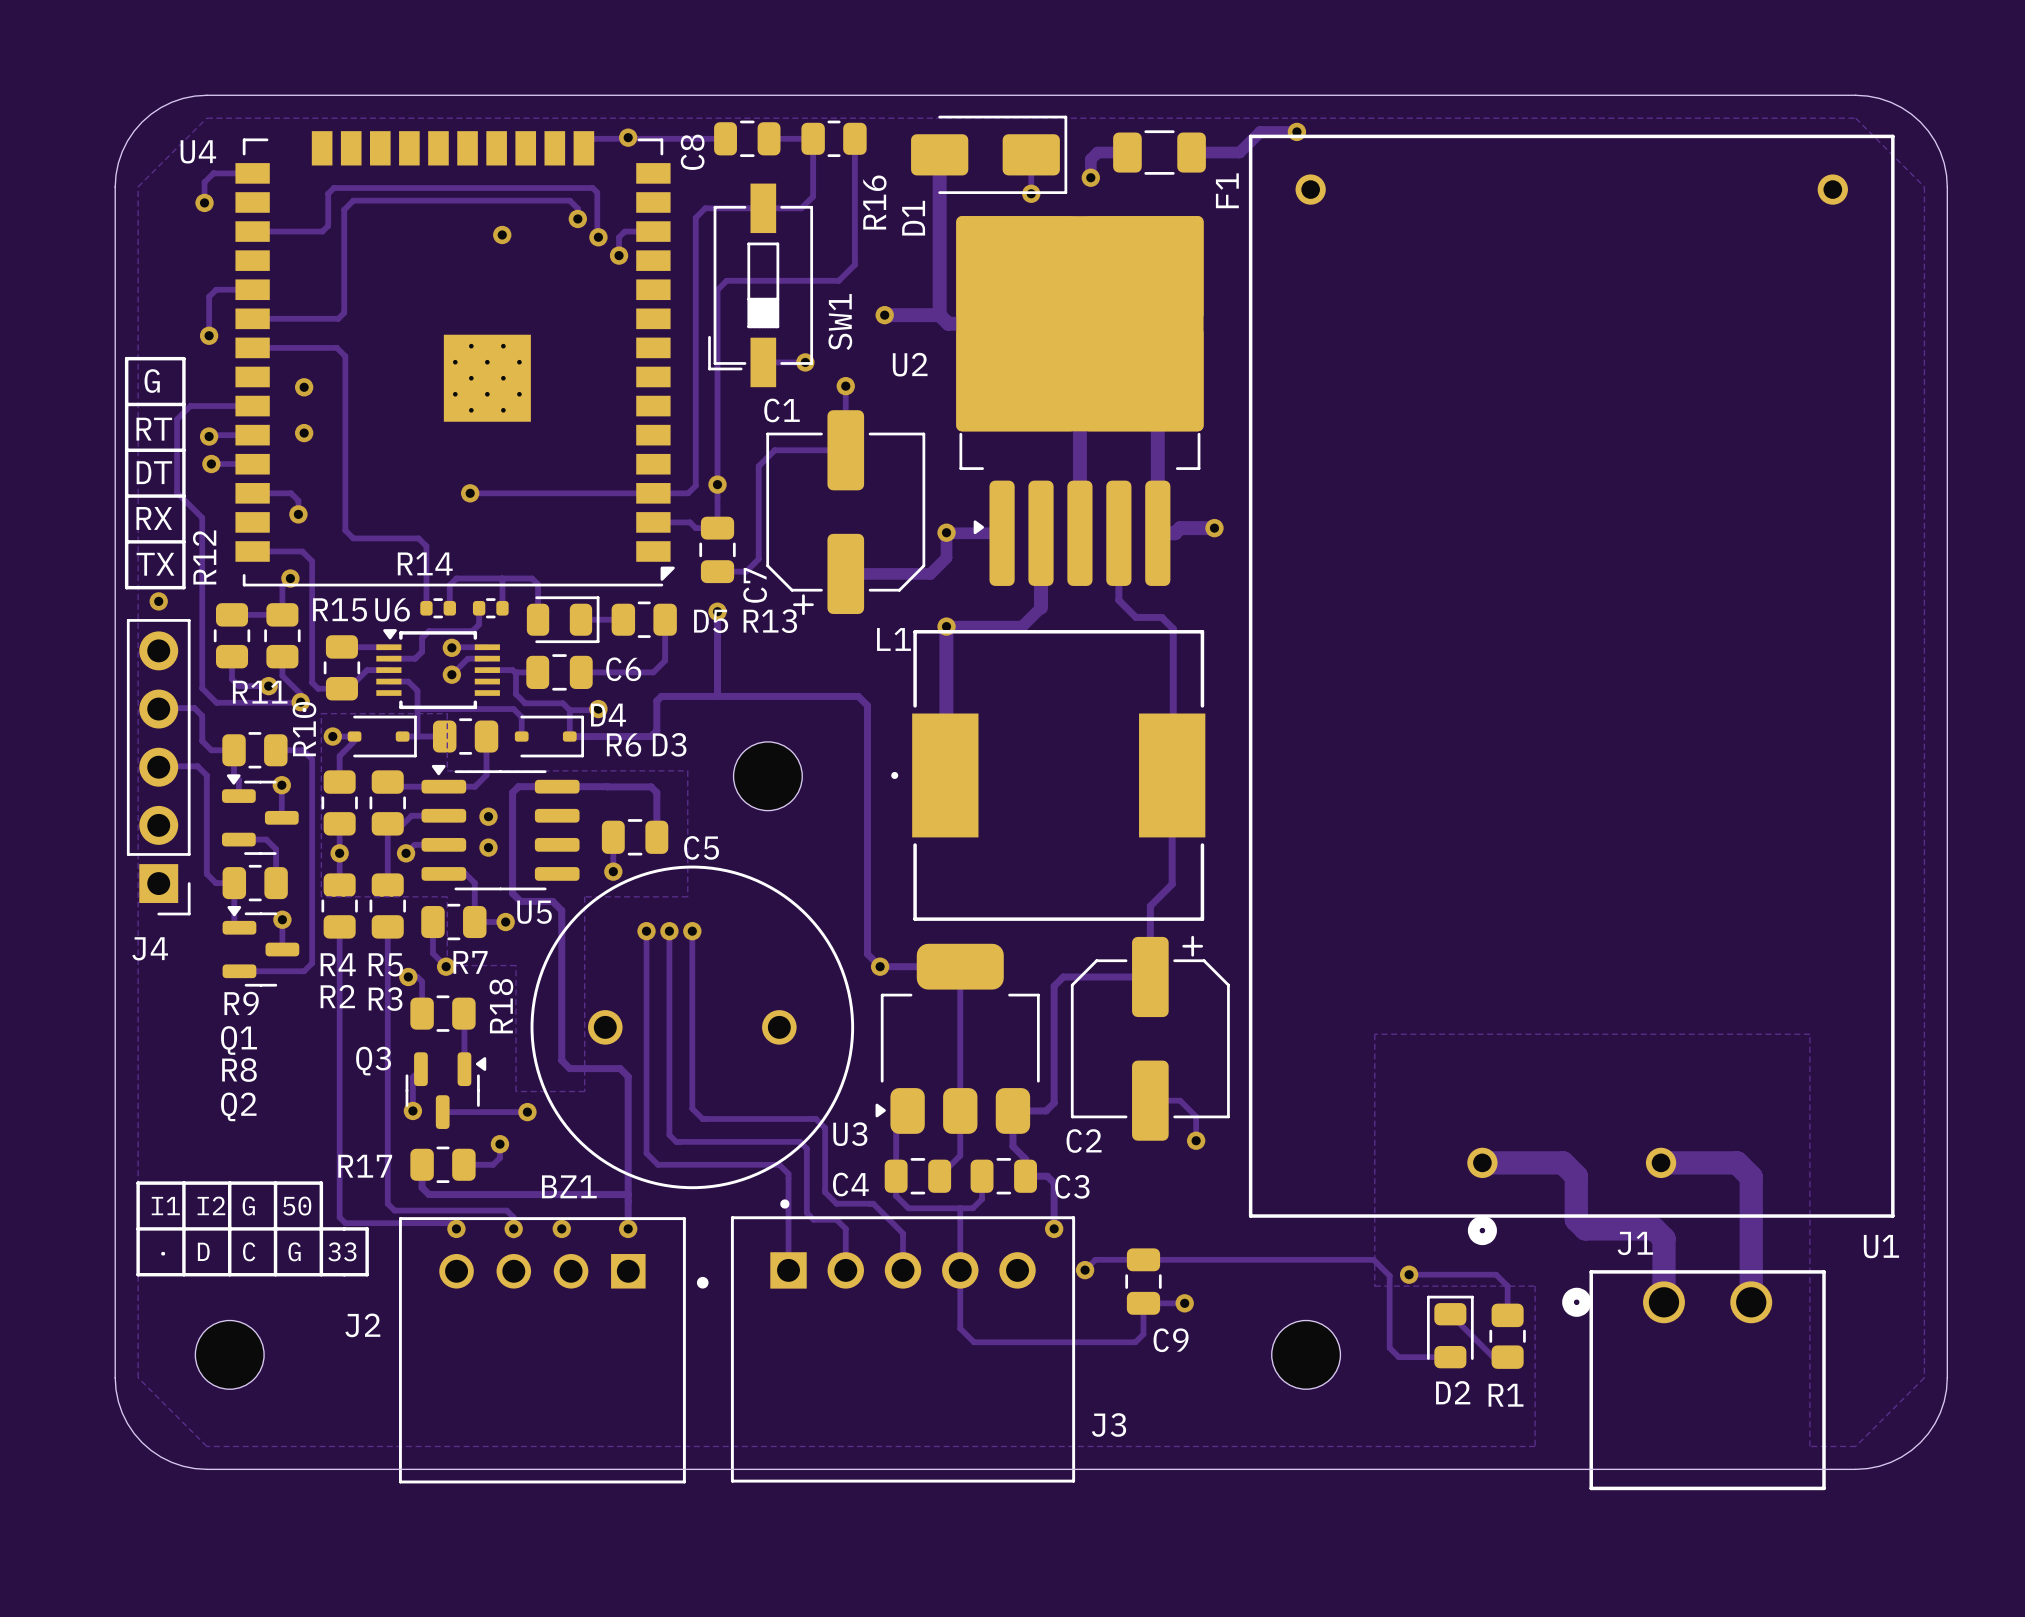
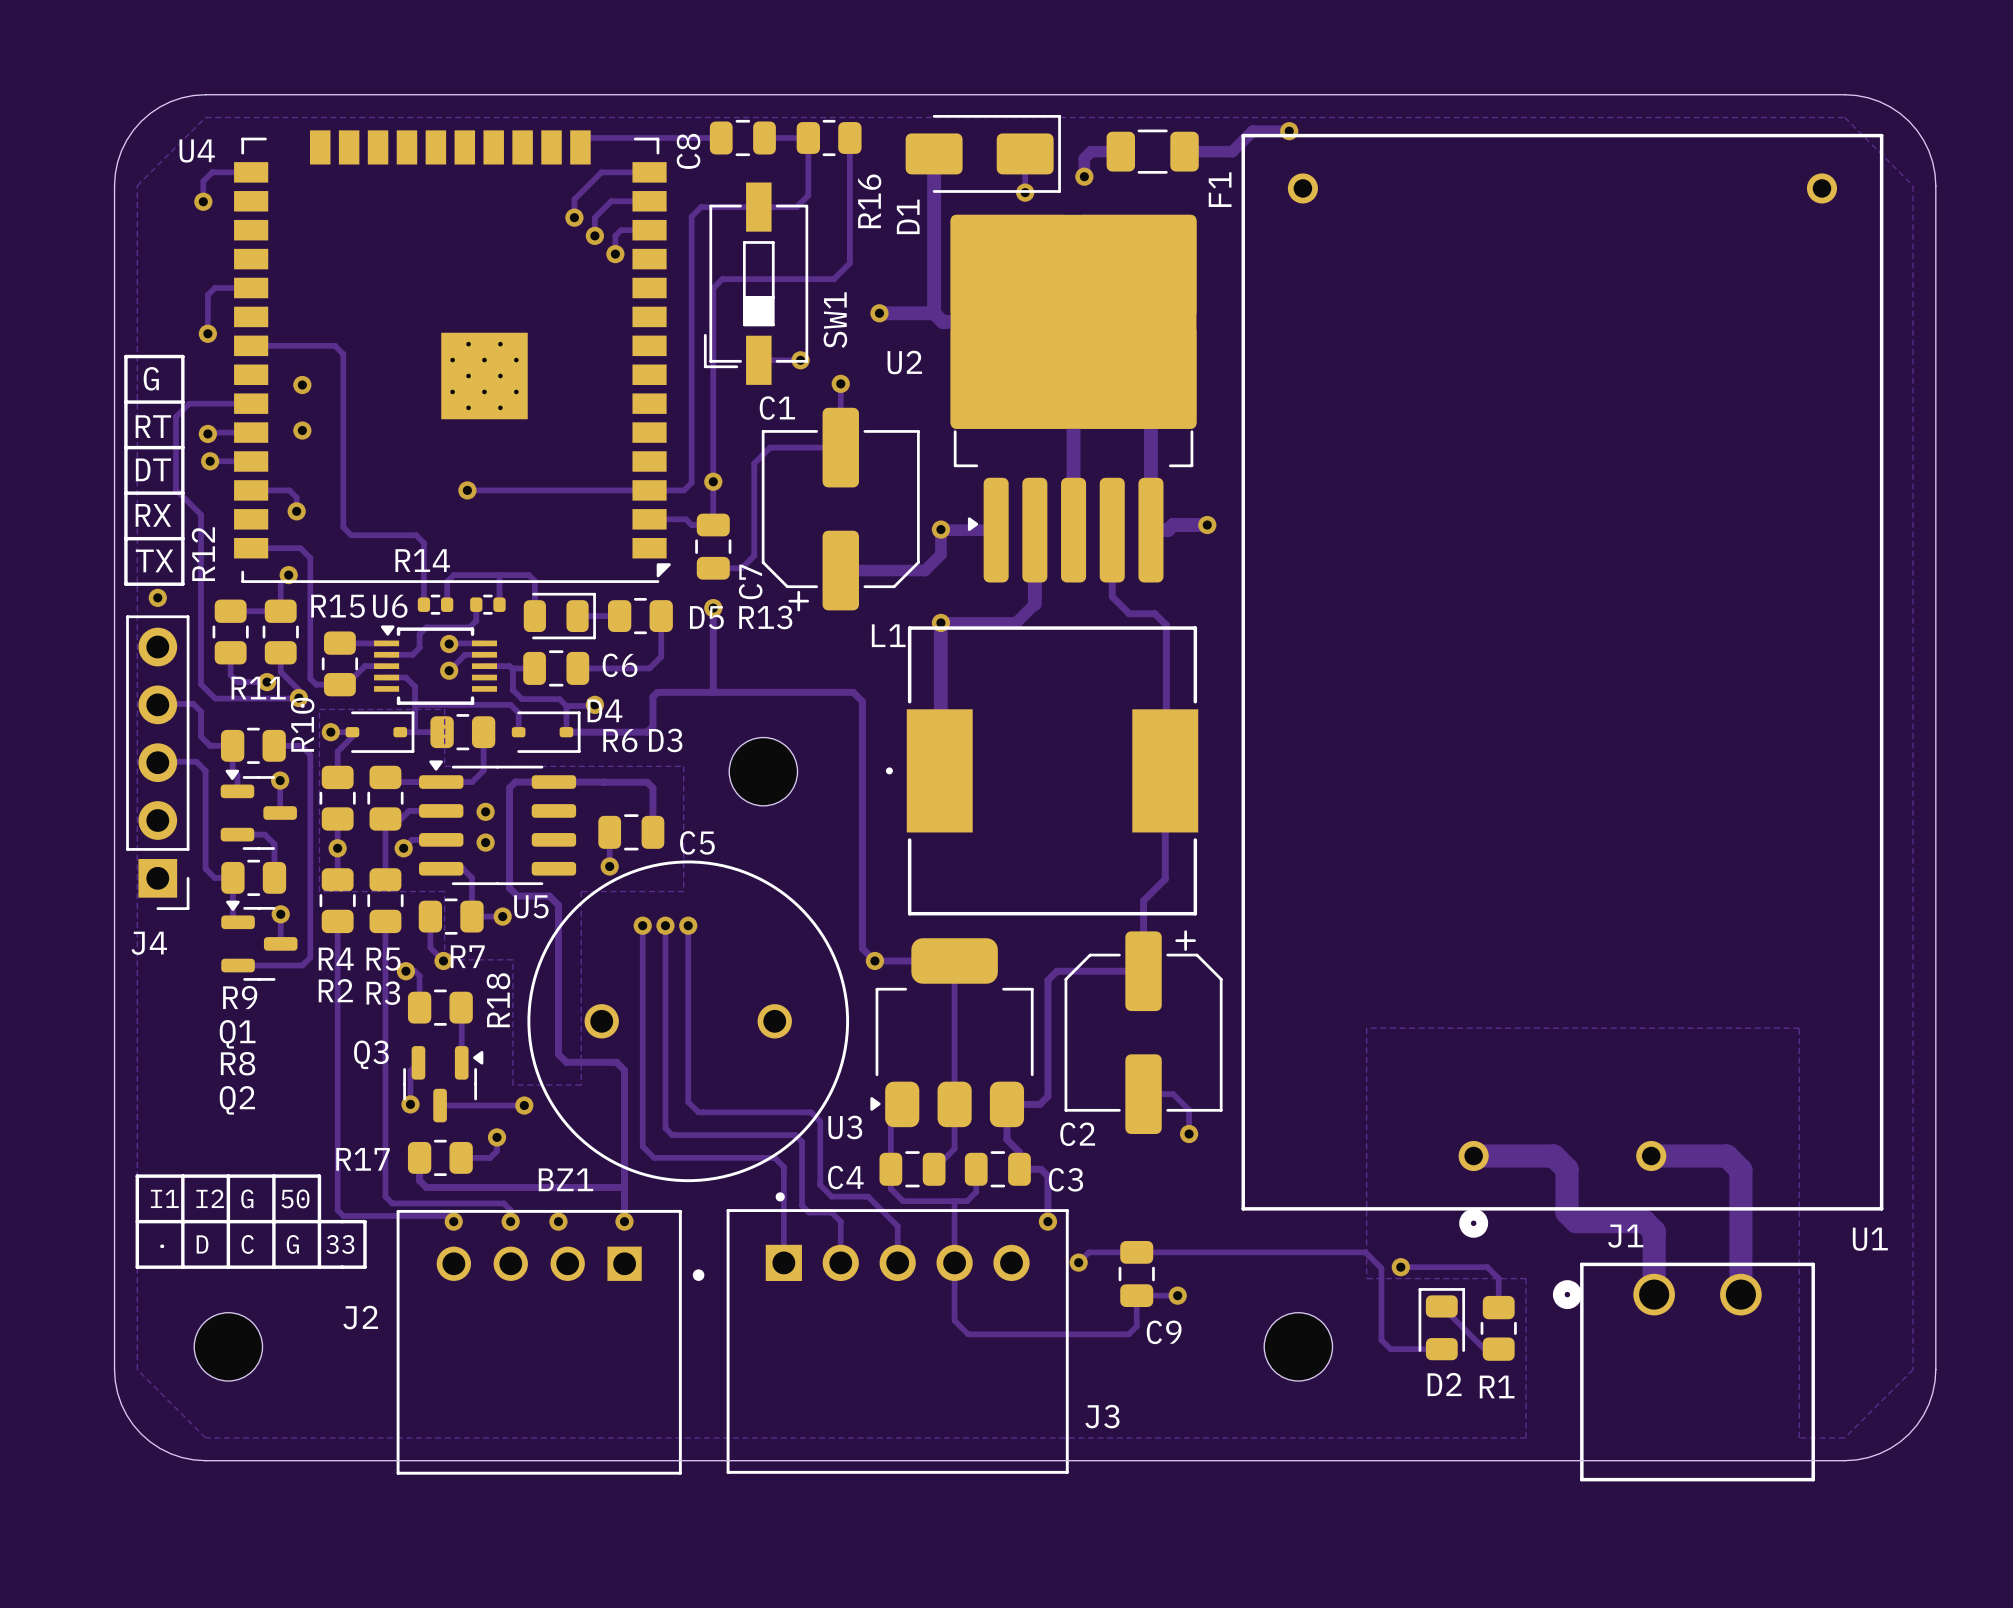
via: (628, 137) -> none
track: (577, 208) (569, 200) (353, 200) (344, 209) (344, 312) (338, 318) (252, 318) -> (574, 207) (574, 199) (601, 172) (649, 172)
track: (252, 231) (322, 231) (328, 225) (328, 193) (333, 188) (592, 188) (597, 192) (598, 237) -> (649, 201) (611, 201) (594, 217) (594, 235)
via: (502, 234) -> none

